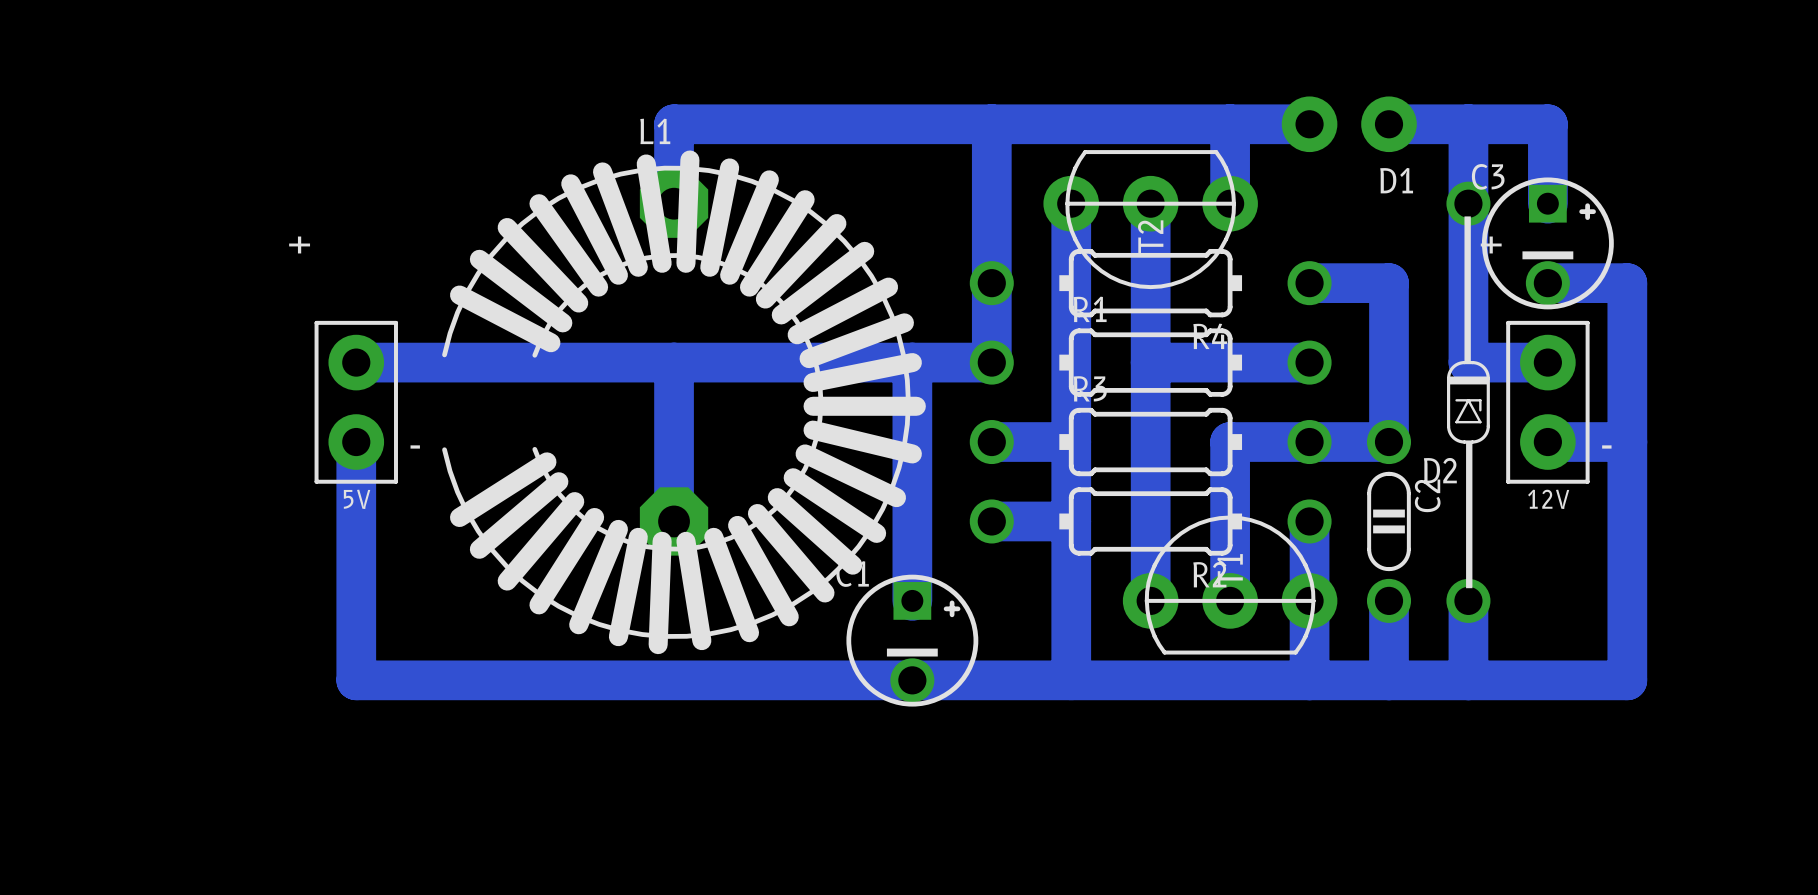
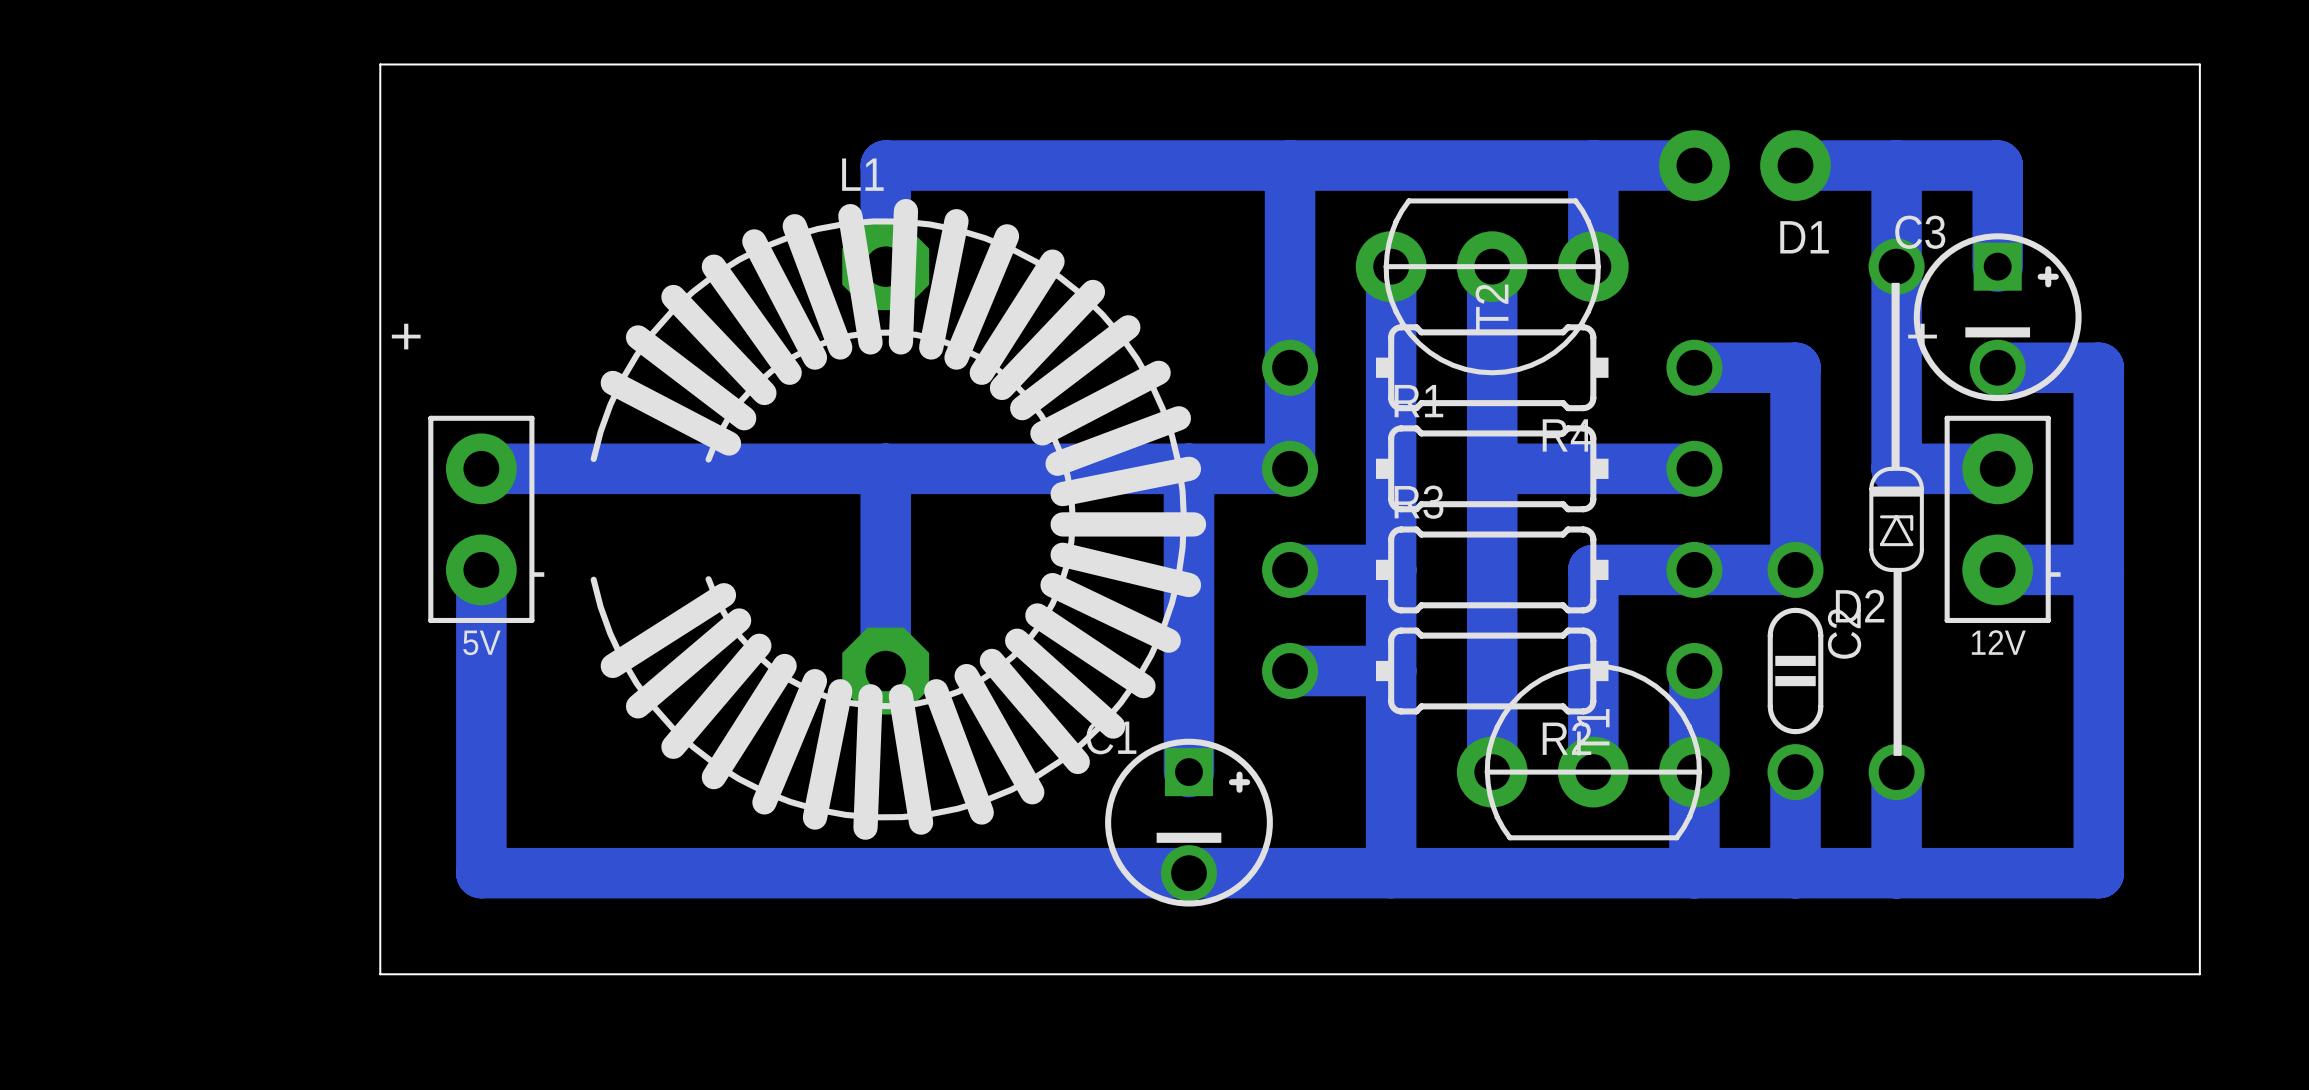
board edge: none -> (380, 64) (2199, 64) (2199, 974) (380, 974) (380, 64)

